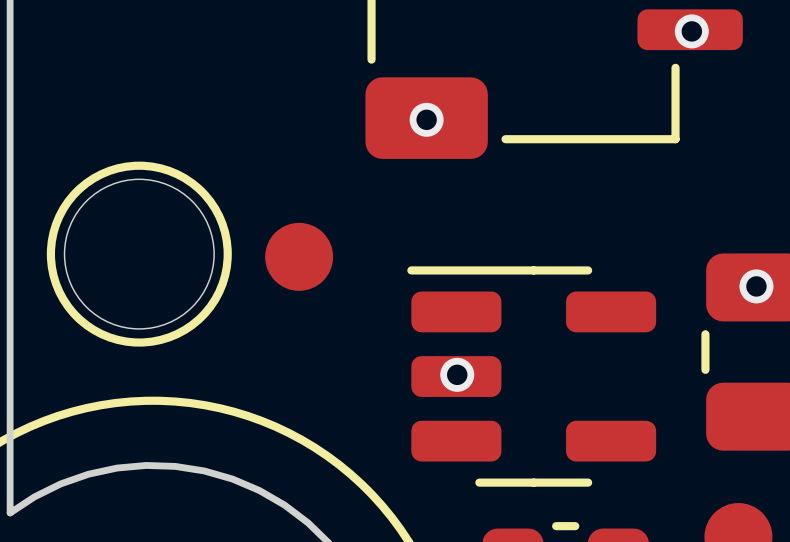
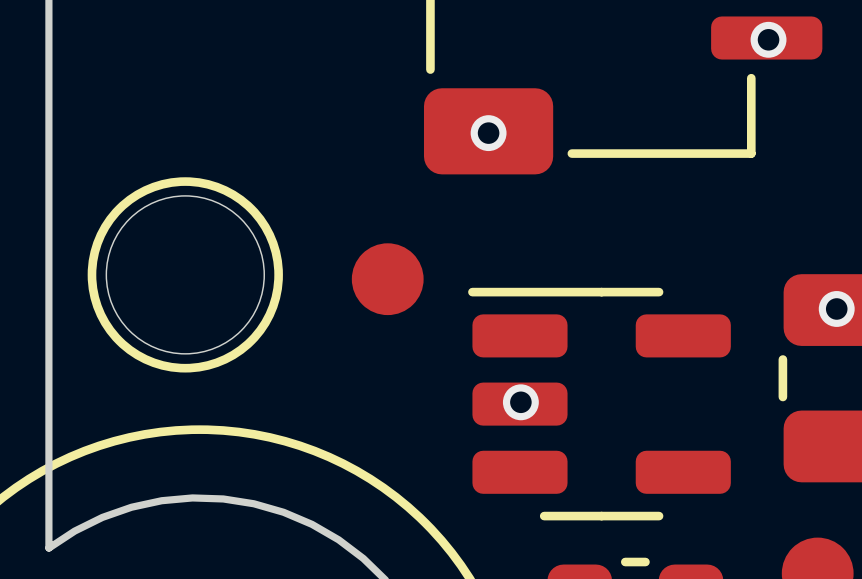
part position: (299, 256) -> (387, 279)

